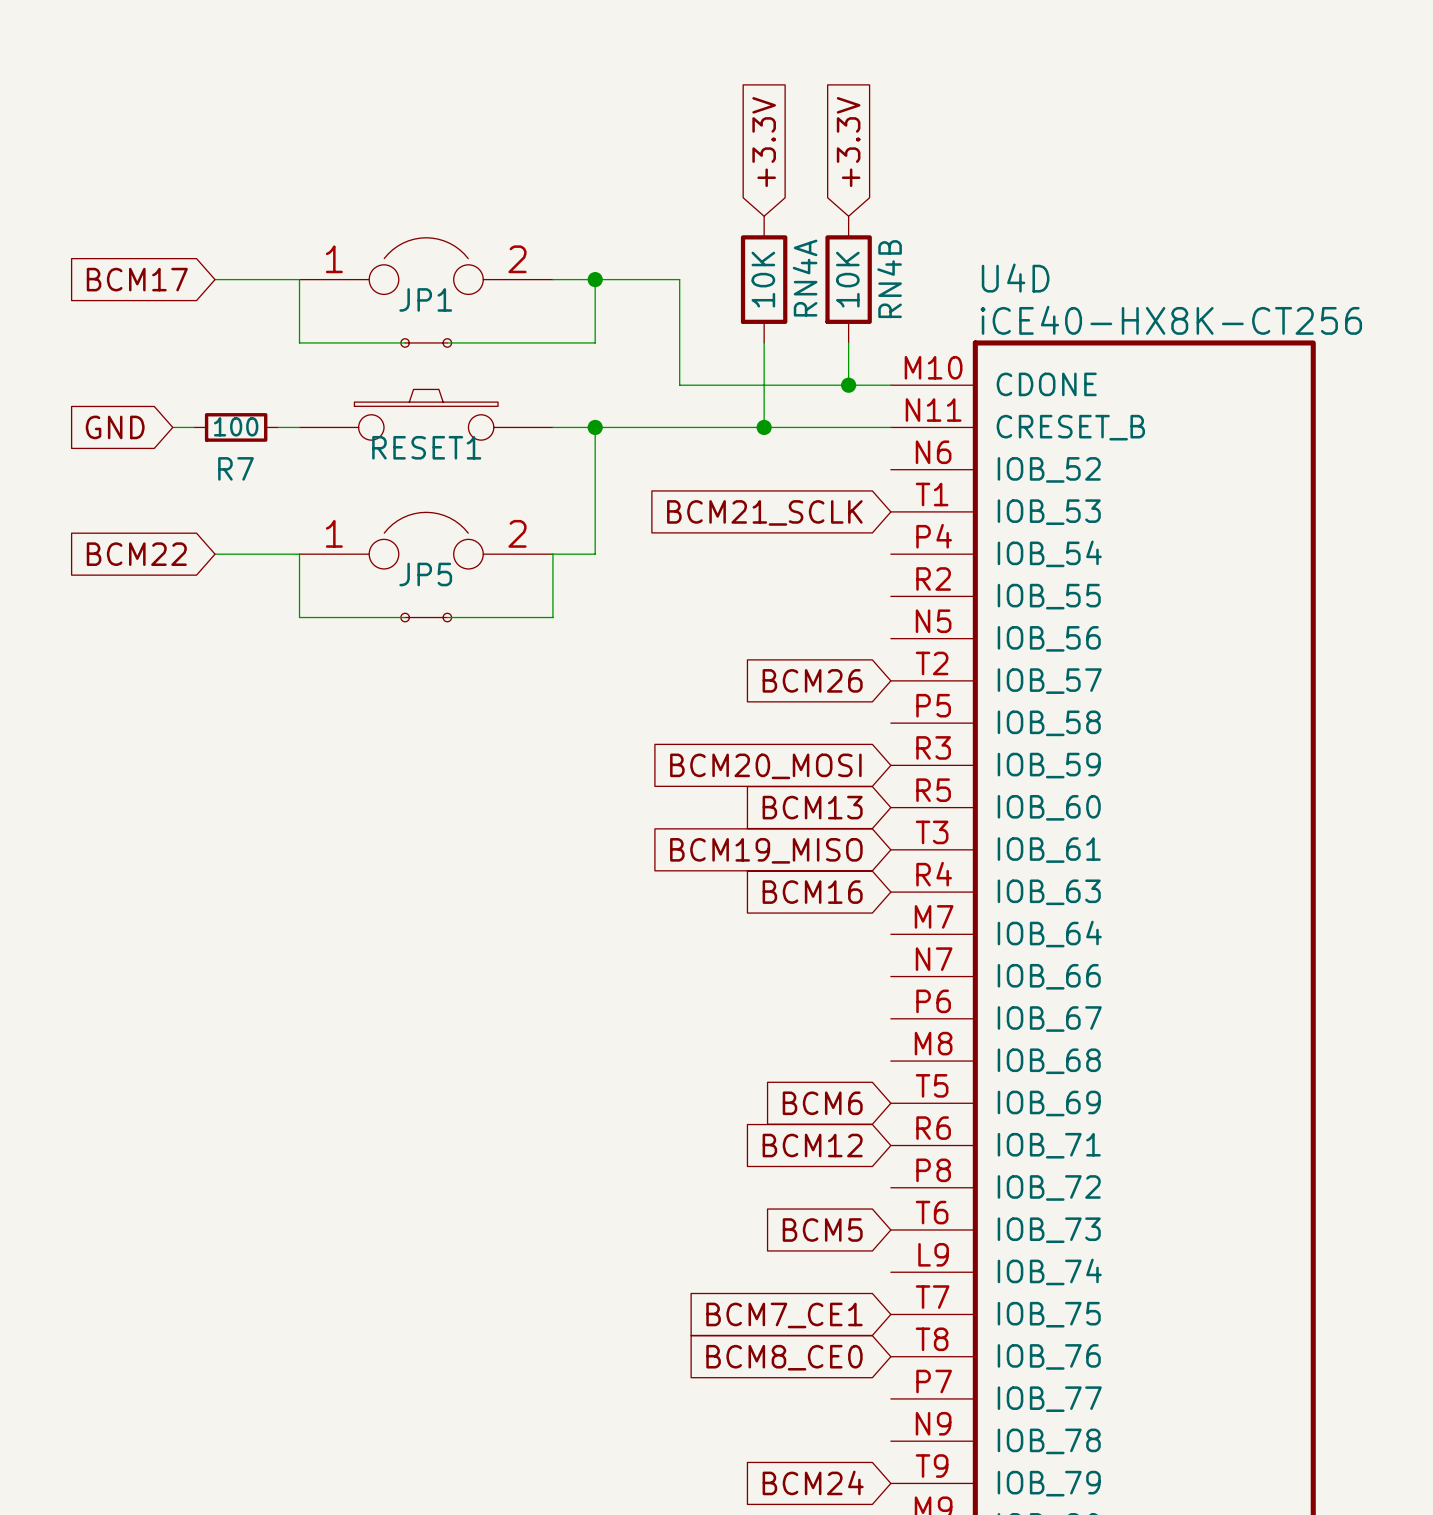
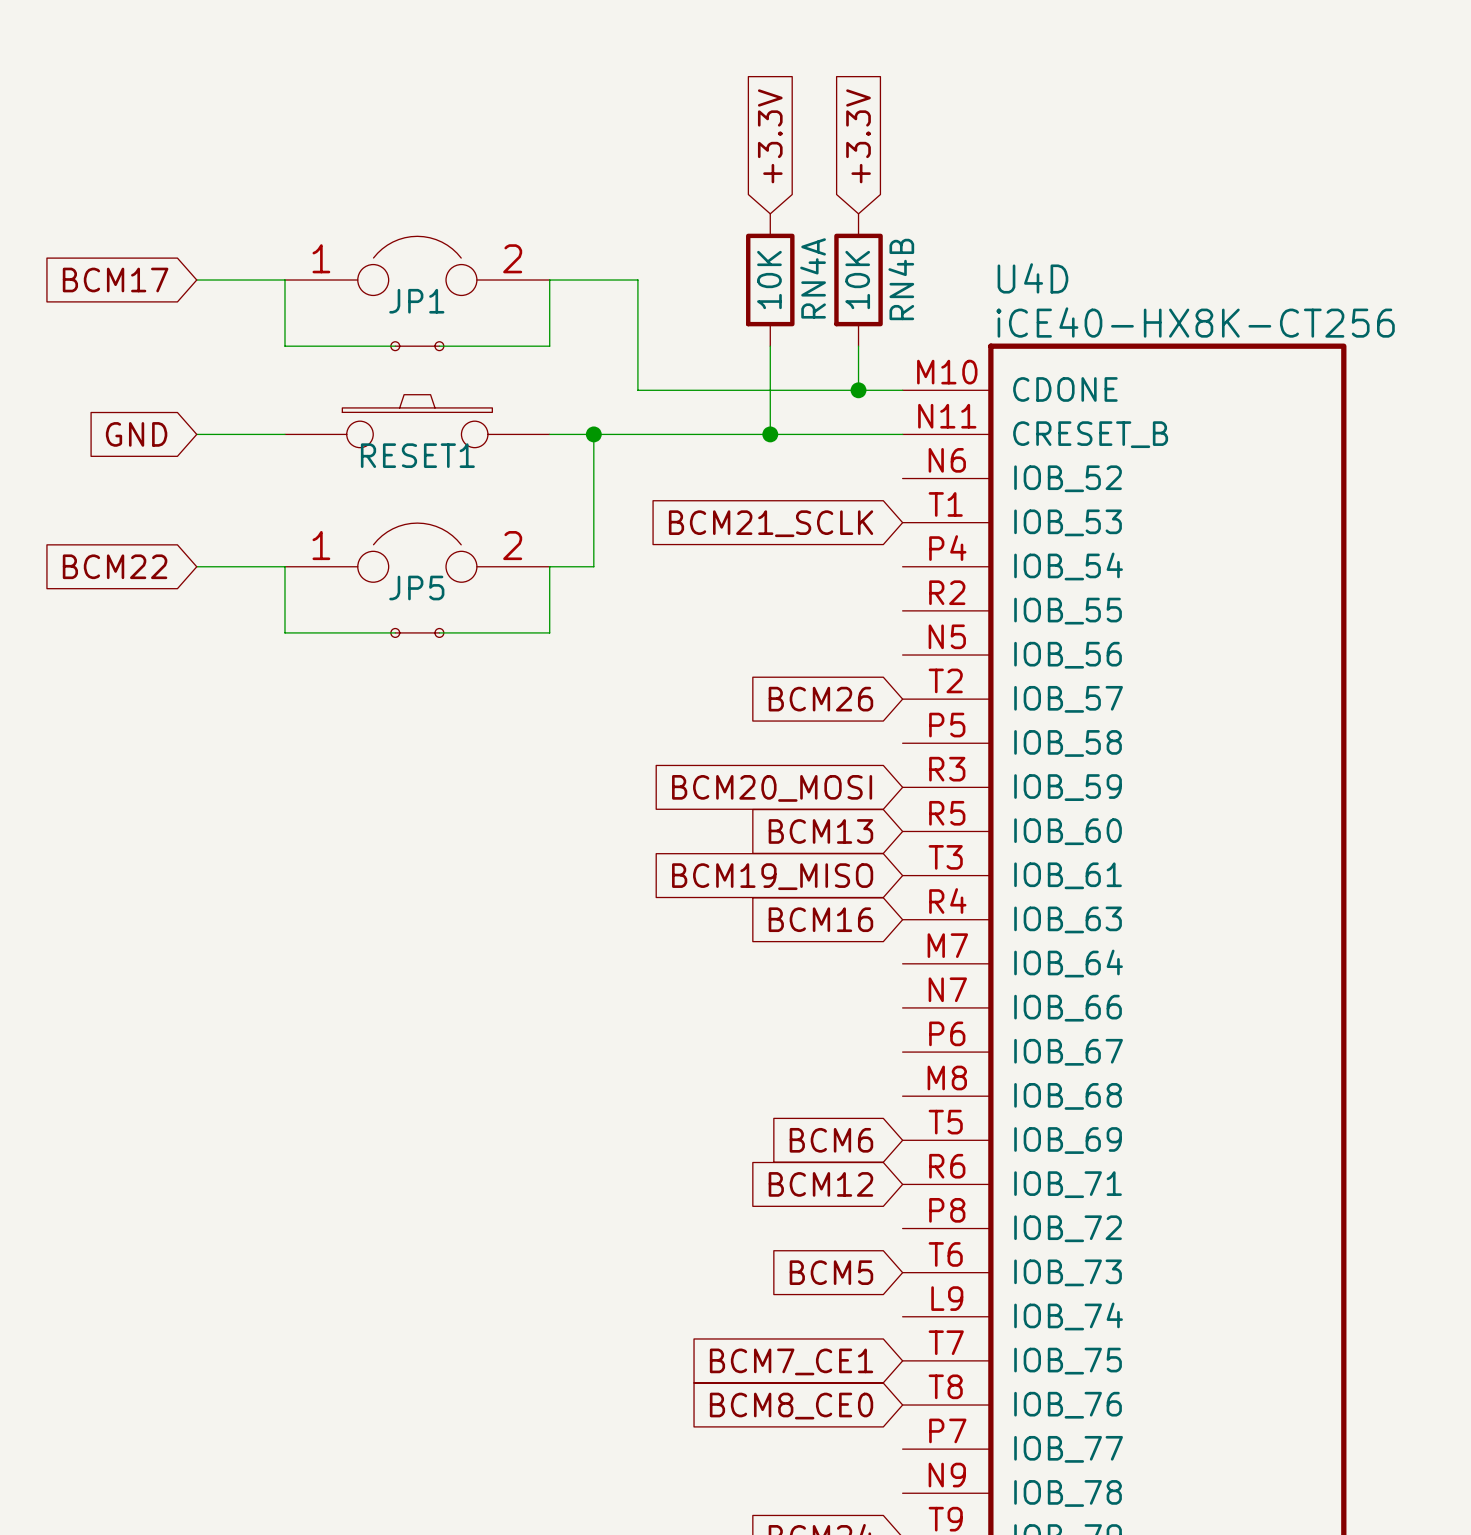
wire: (595, 279) (595, 342) (552, 342) -> (549, 280) (549, 346)
junction: (595, 279) -> none
wire: (637, 279) (679, 279) (679, 385) -> (637, 280) (637, 390) (682, 390)
global label position: GND (115, 427) -> GND (136, 434)
wire: (172, 427) (193, 427) -> none
wire: none -> (196, 434) (262, 434)
R7: 100 (236, 427) -> none

